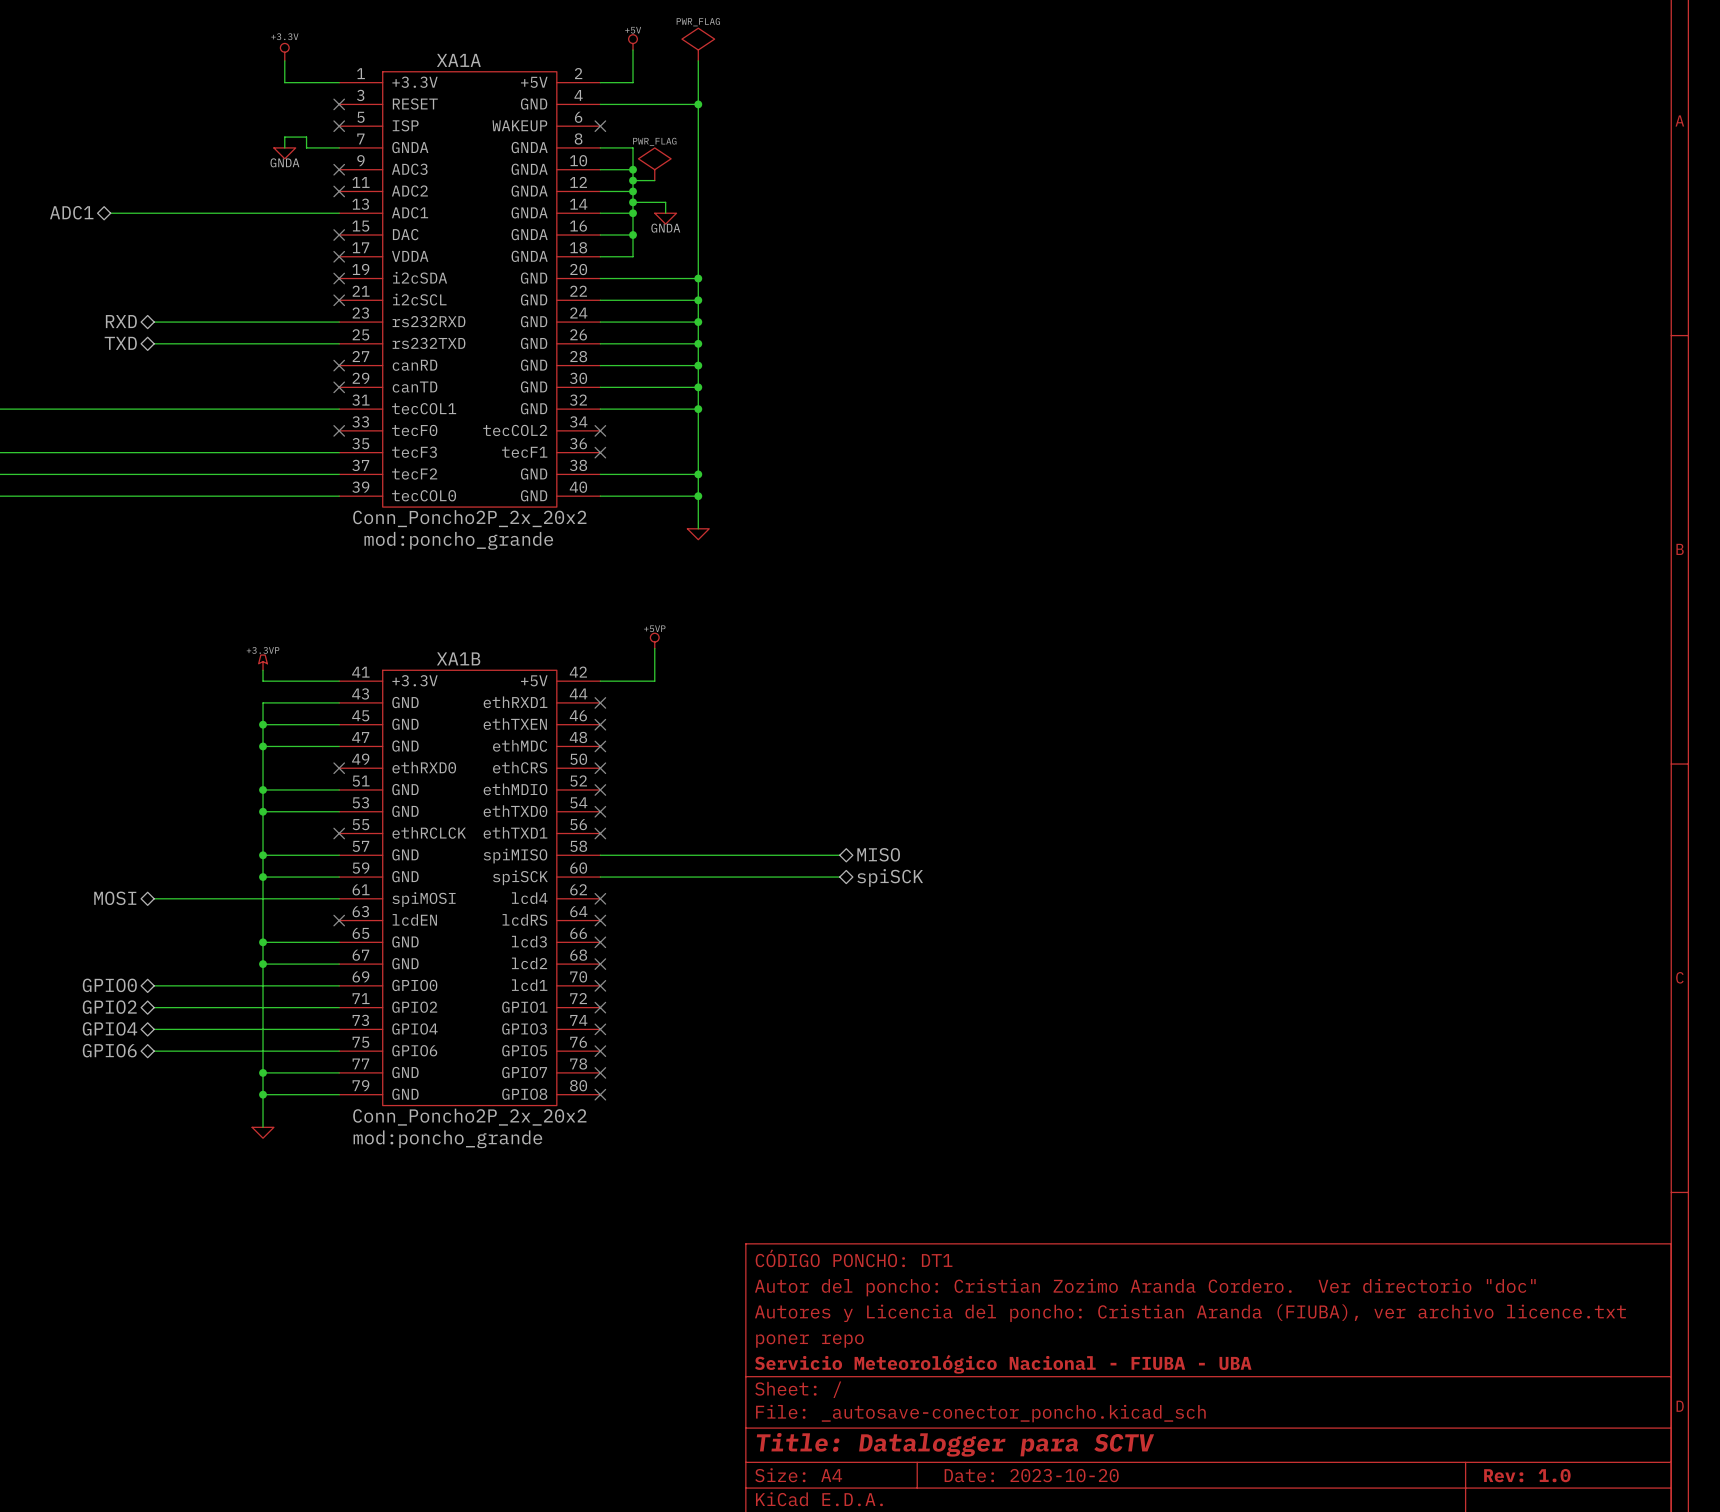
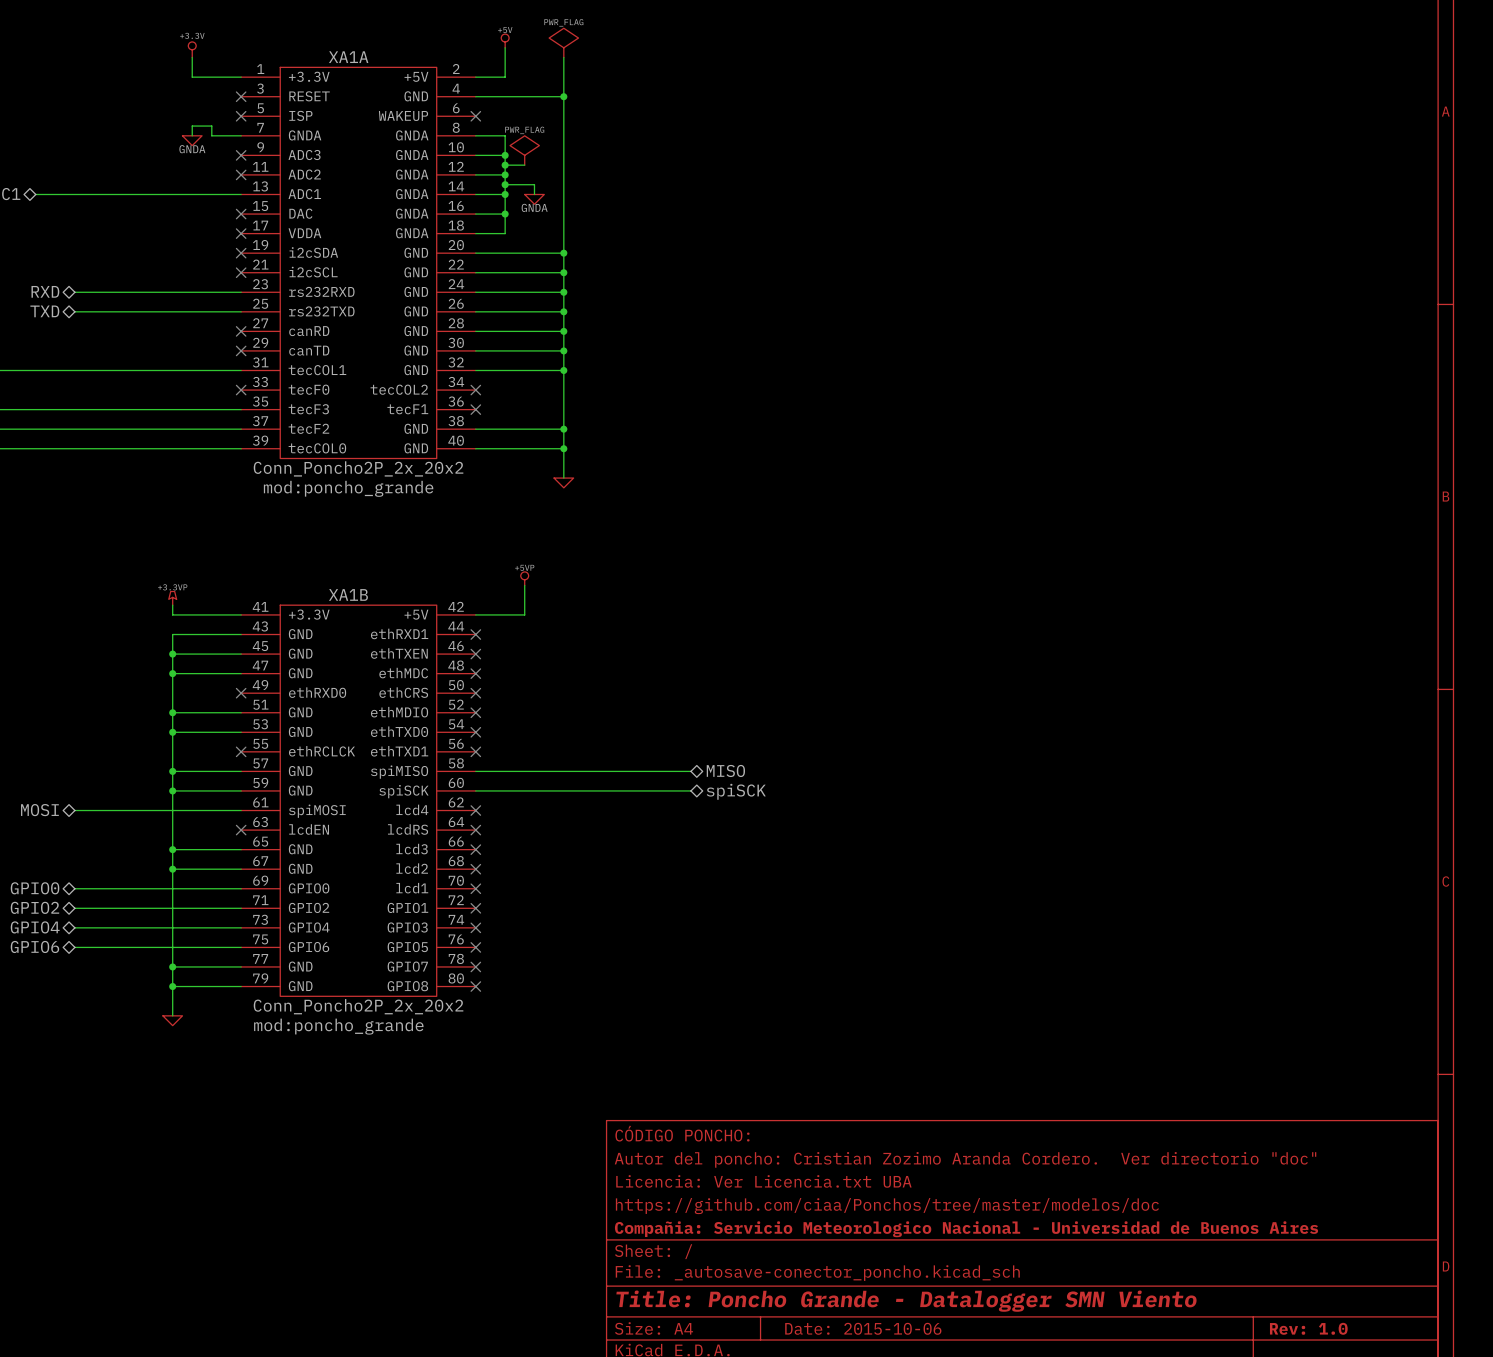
title block: CÓDIGO PONCHO: DT1 (854, 1258) -> CÓDIGO PONCHO: (682, 1133)
title block: Autores y Licencia del poncho: Cristian Aranda (FIUBA), ver archivo licence.txt (1190, 1313) -> Licencia: Ver Licencia.txt UBA (763, 1181)
title block: poner repo (809, 1341) -> https://github.com/ciaa/Ponchos/tree/master/modelos/doc (887, 1206)
title block: Servicio Meteorológico Nacional - FIUBA - UBA (1003, 1364) -> Compañia: Servicio Meteorologico Nacional - Universidad de Buenos Aires (966, 1229)
title block: Title: Datalogger para SCTV (955, 1444) -> Title: Poncho Grande - Datalogger SMN Viento (906, 1301)
title block: Date: 2023-10-20 (1031, 1475) -> Date: 2015-10-06 (863, 1328)

